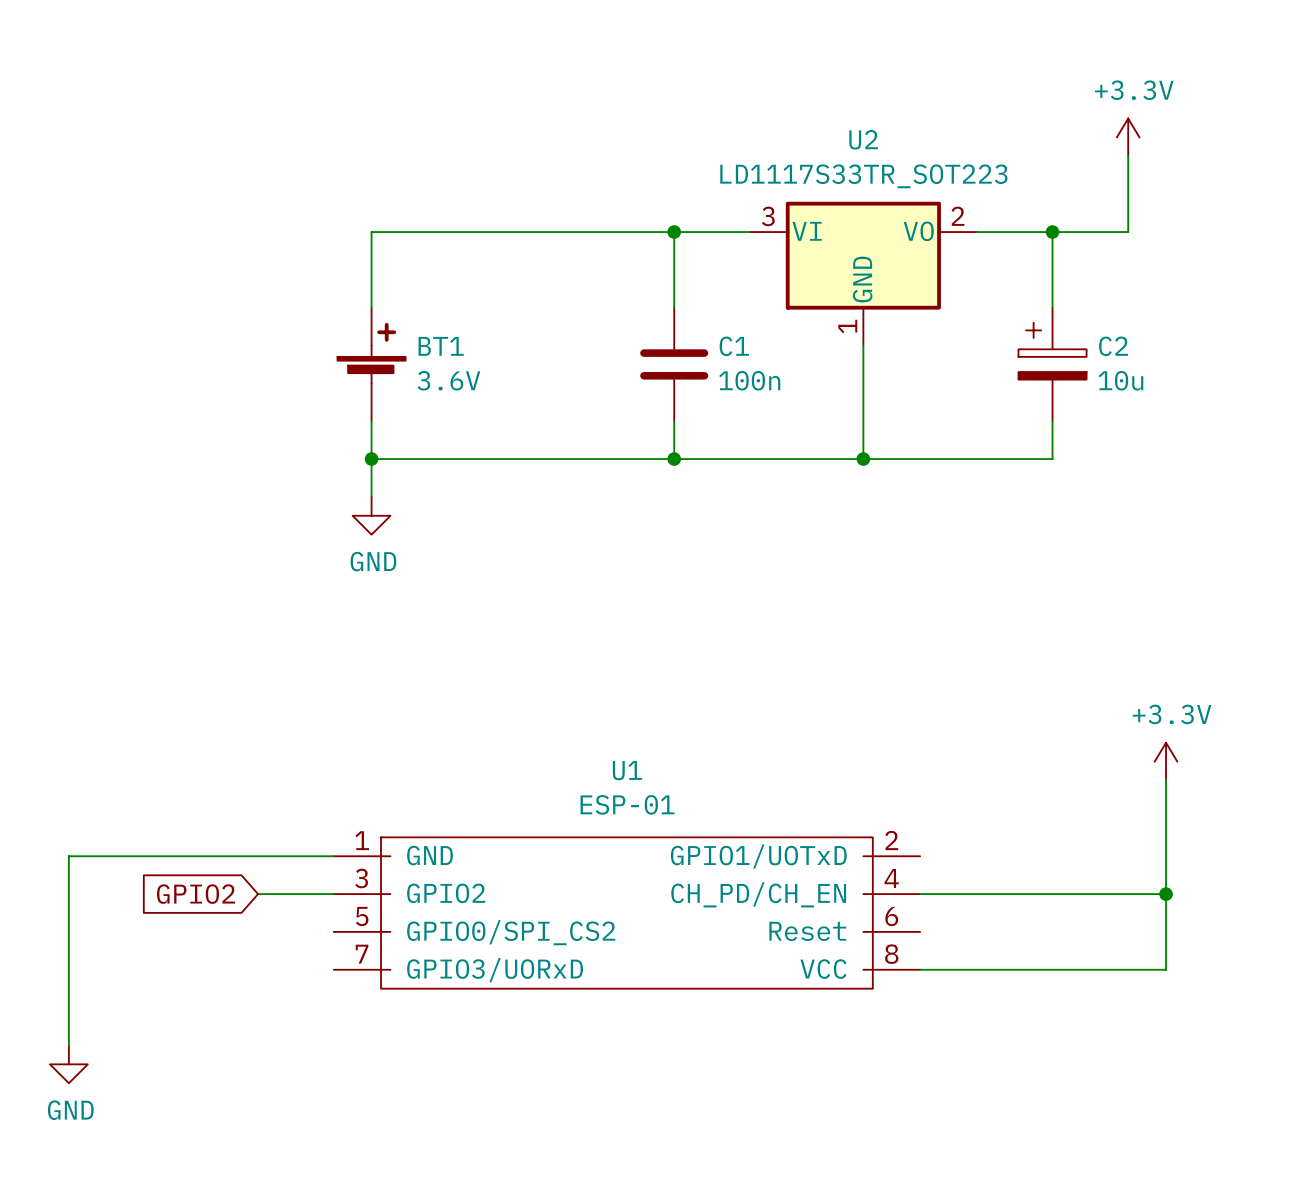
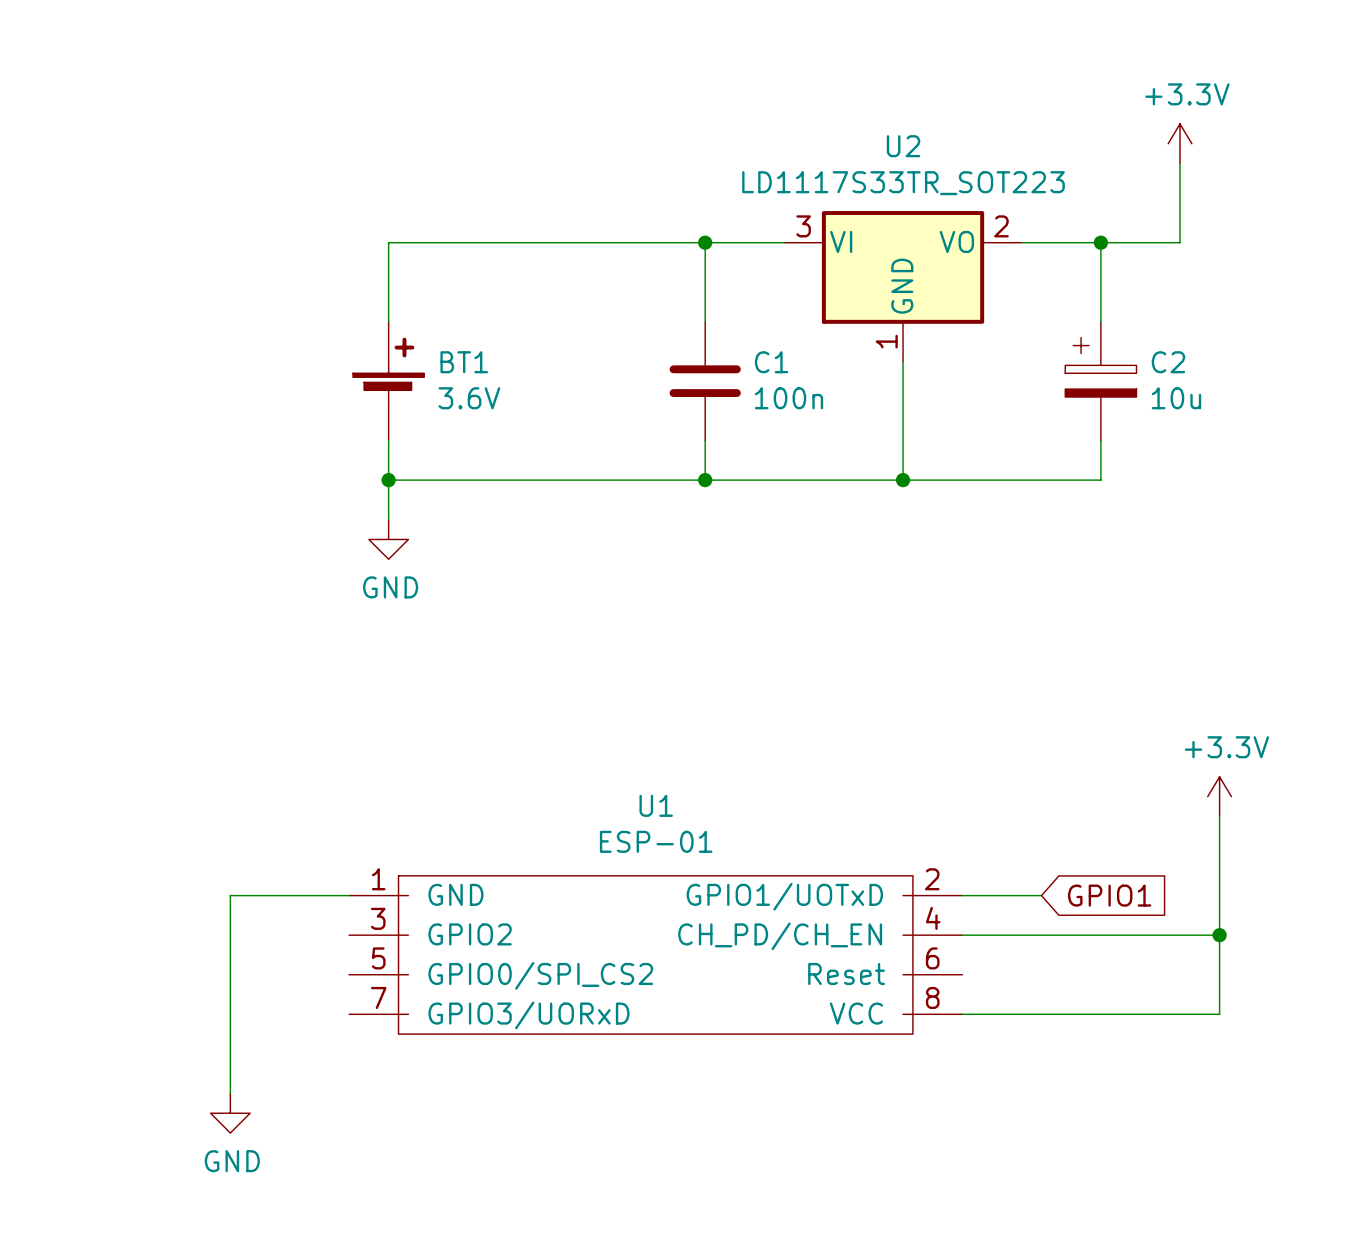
wire: (220, 856) (68, 856) (68, 1045) -> (230, 895) (230, 1093)
wire: none -> (962, 895) (1041, 895)
global label: none -> GPIO1 (1109, 895)
global label: GPIO2 (196, 894) -> none
wire: (258, 894) (333, 894) -> none
power symbol position: GND (68, 1064) -> GND (230, 1113)

